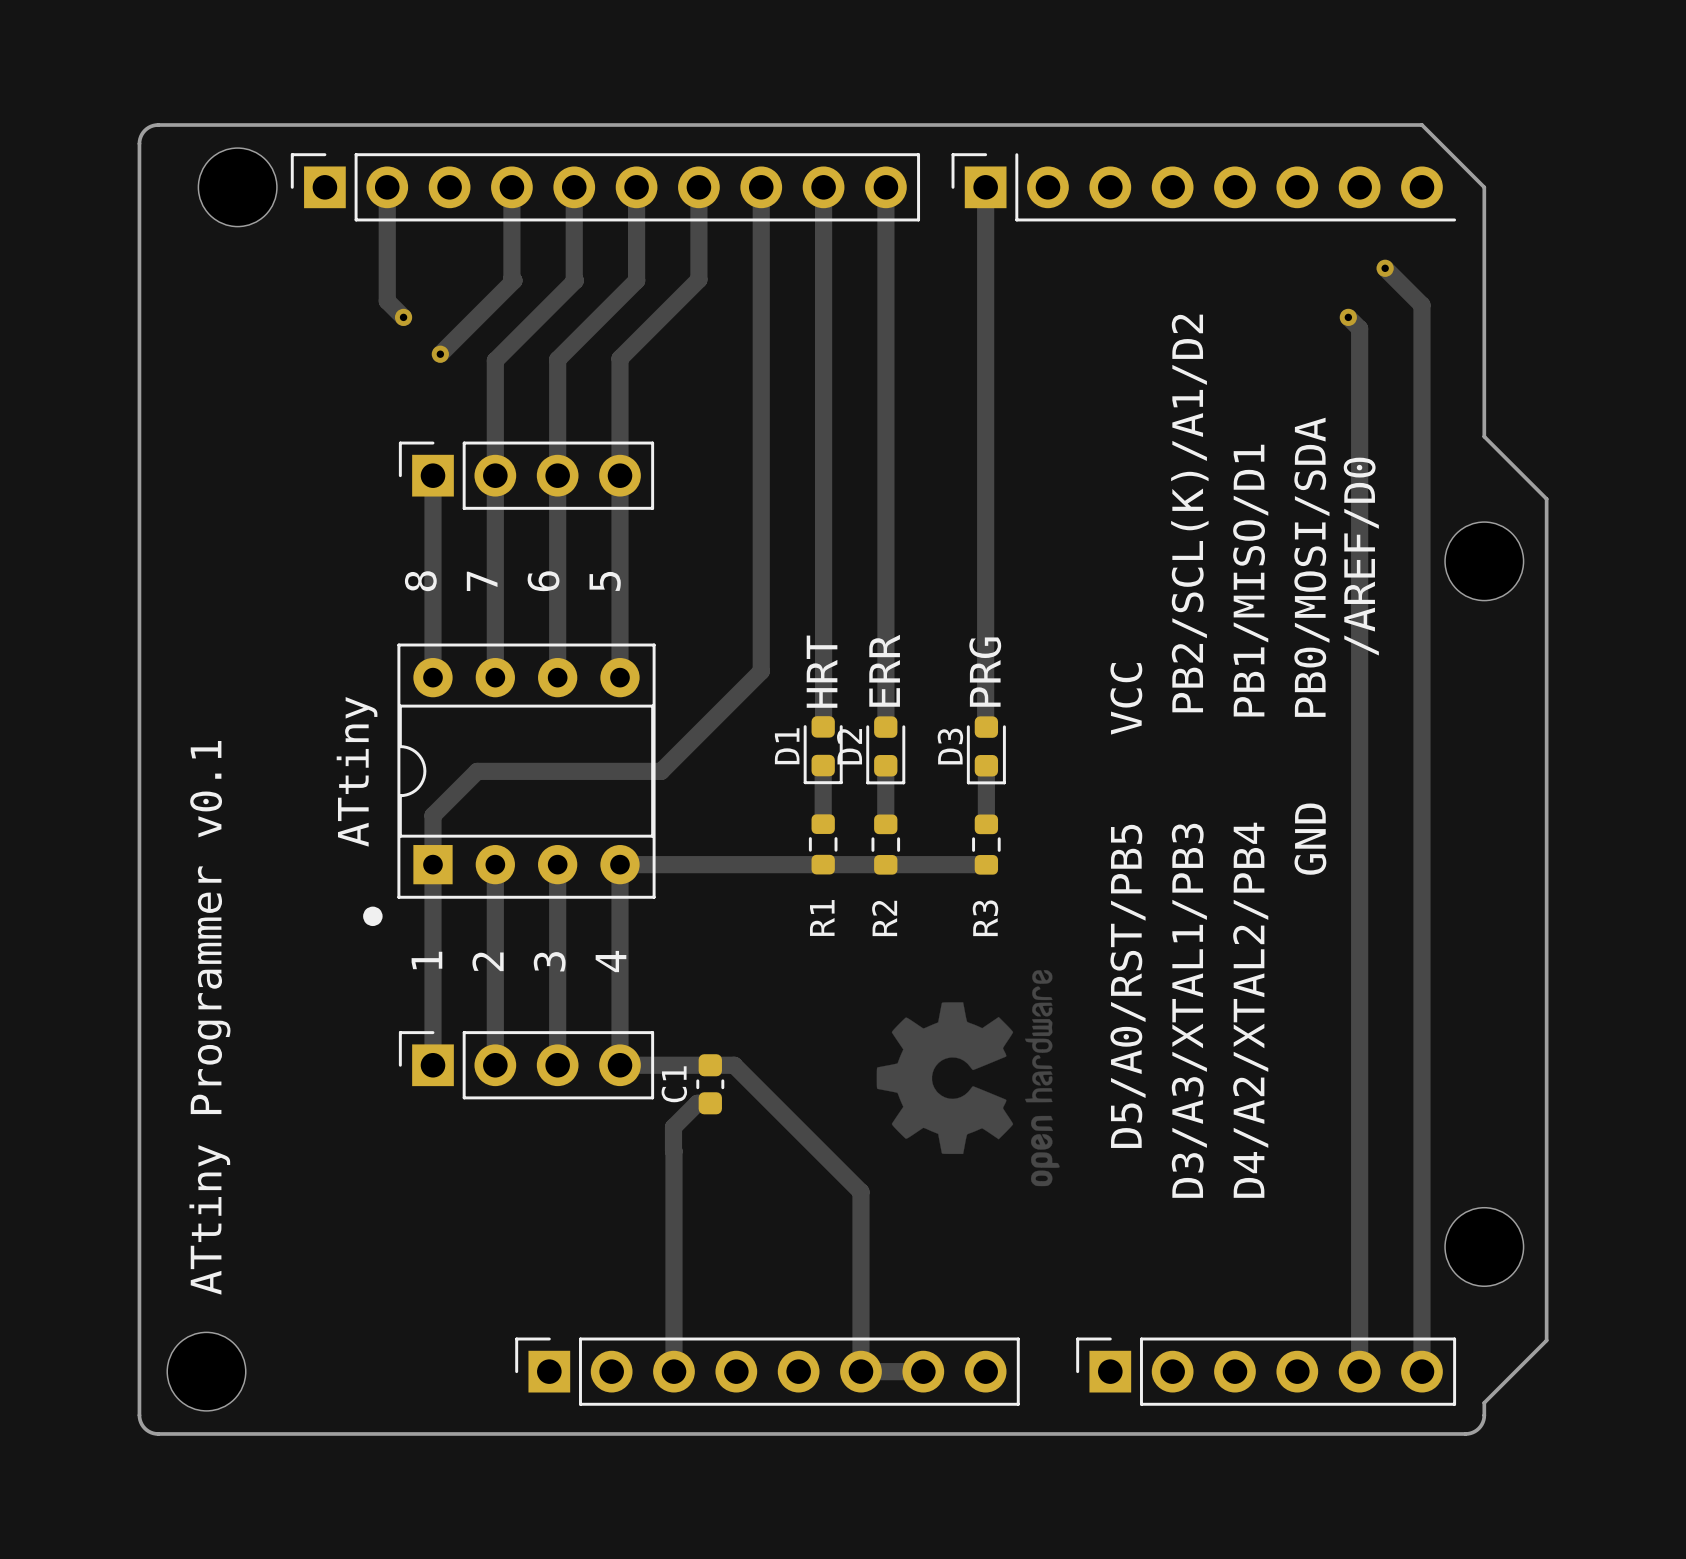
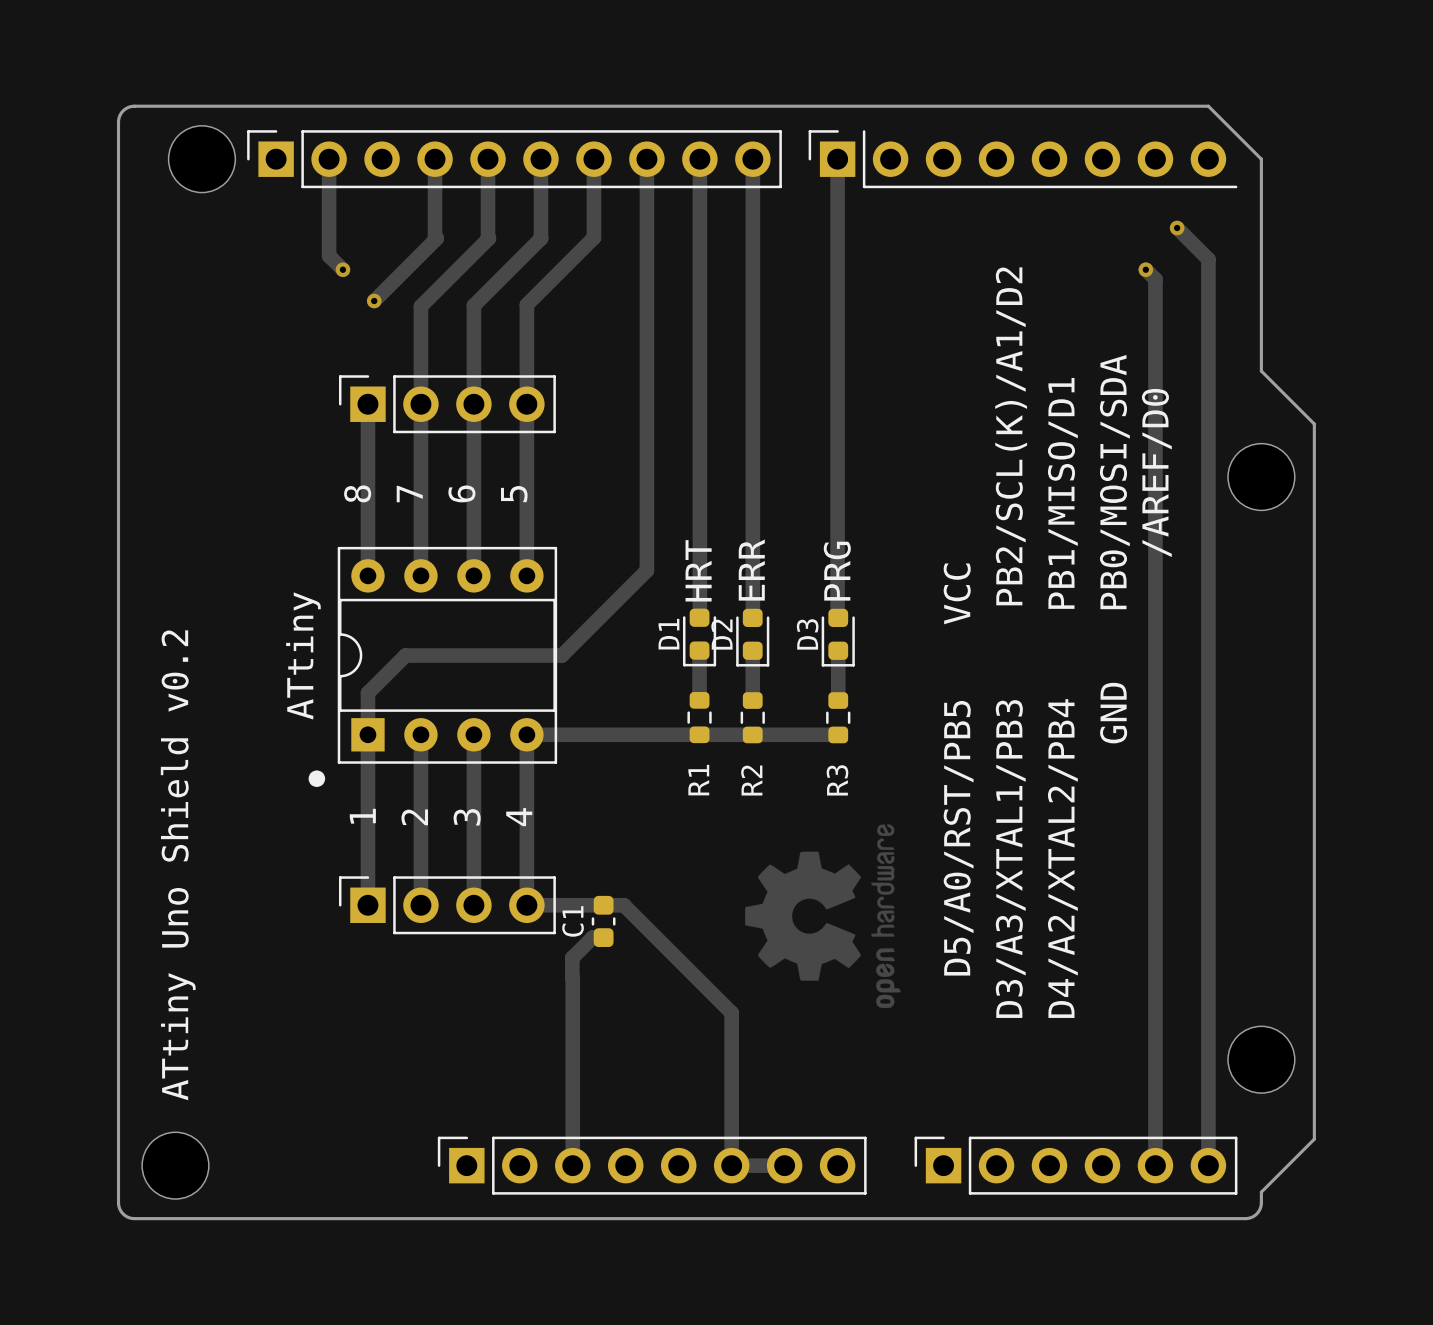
text: ATtiny Programmer v0.1 (209, 1017) -> ATtiny Uno Shield v0.2 (178, 865)

